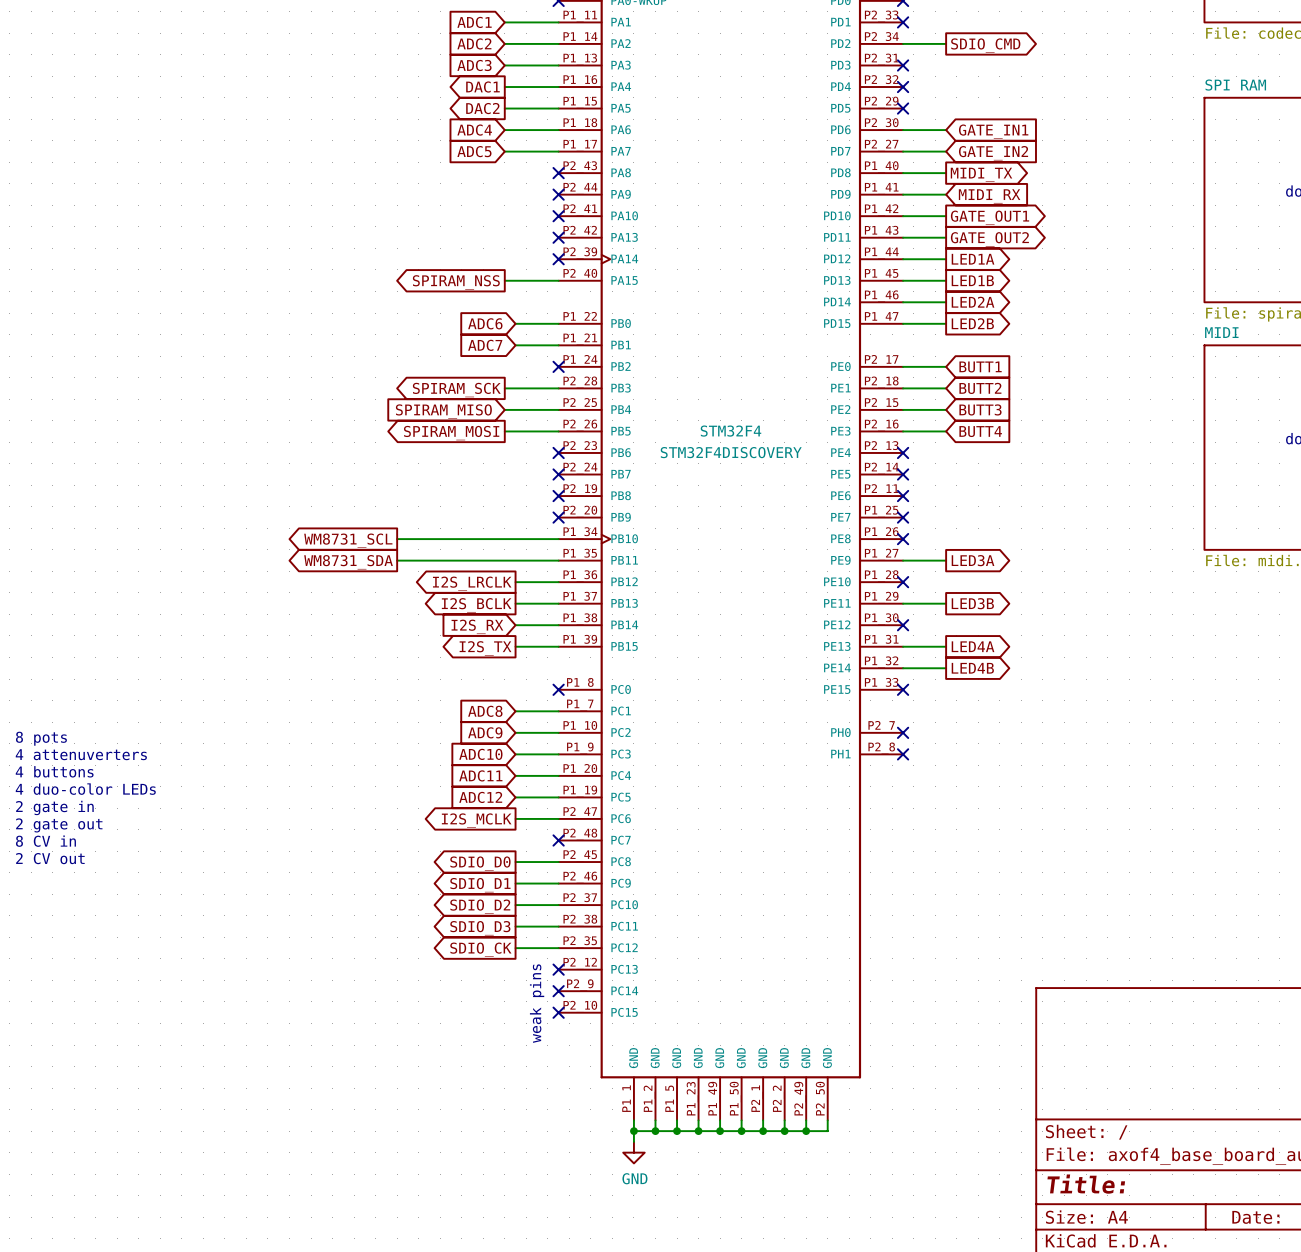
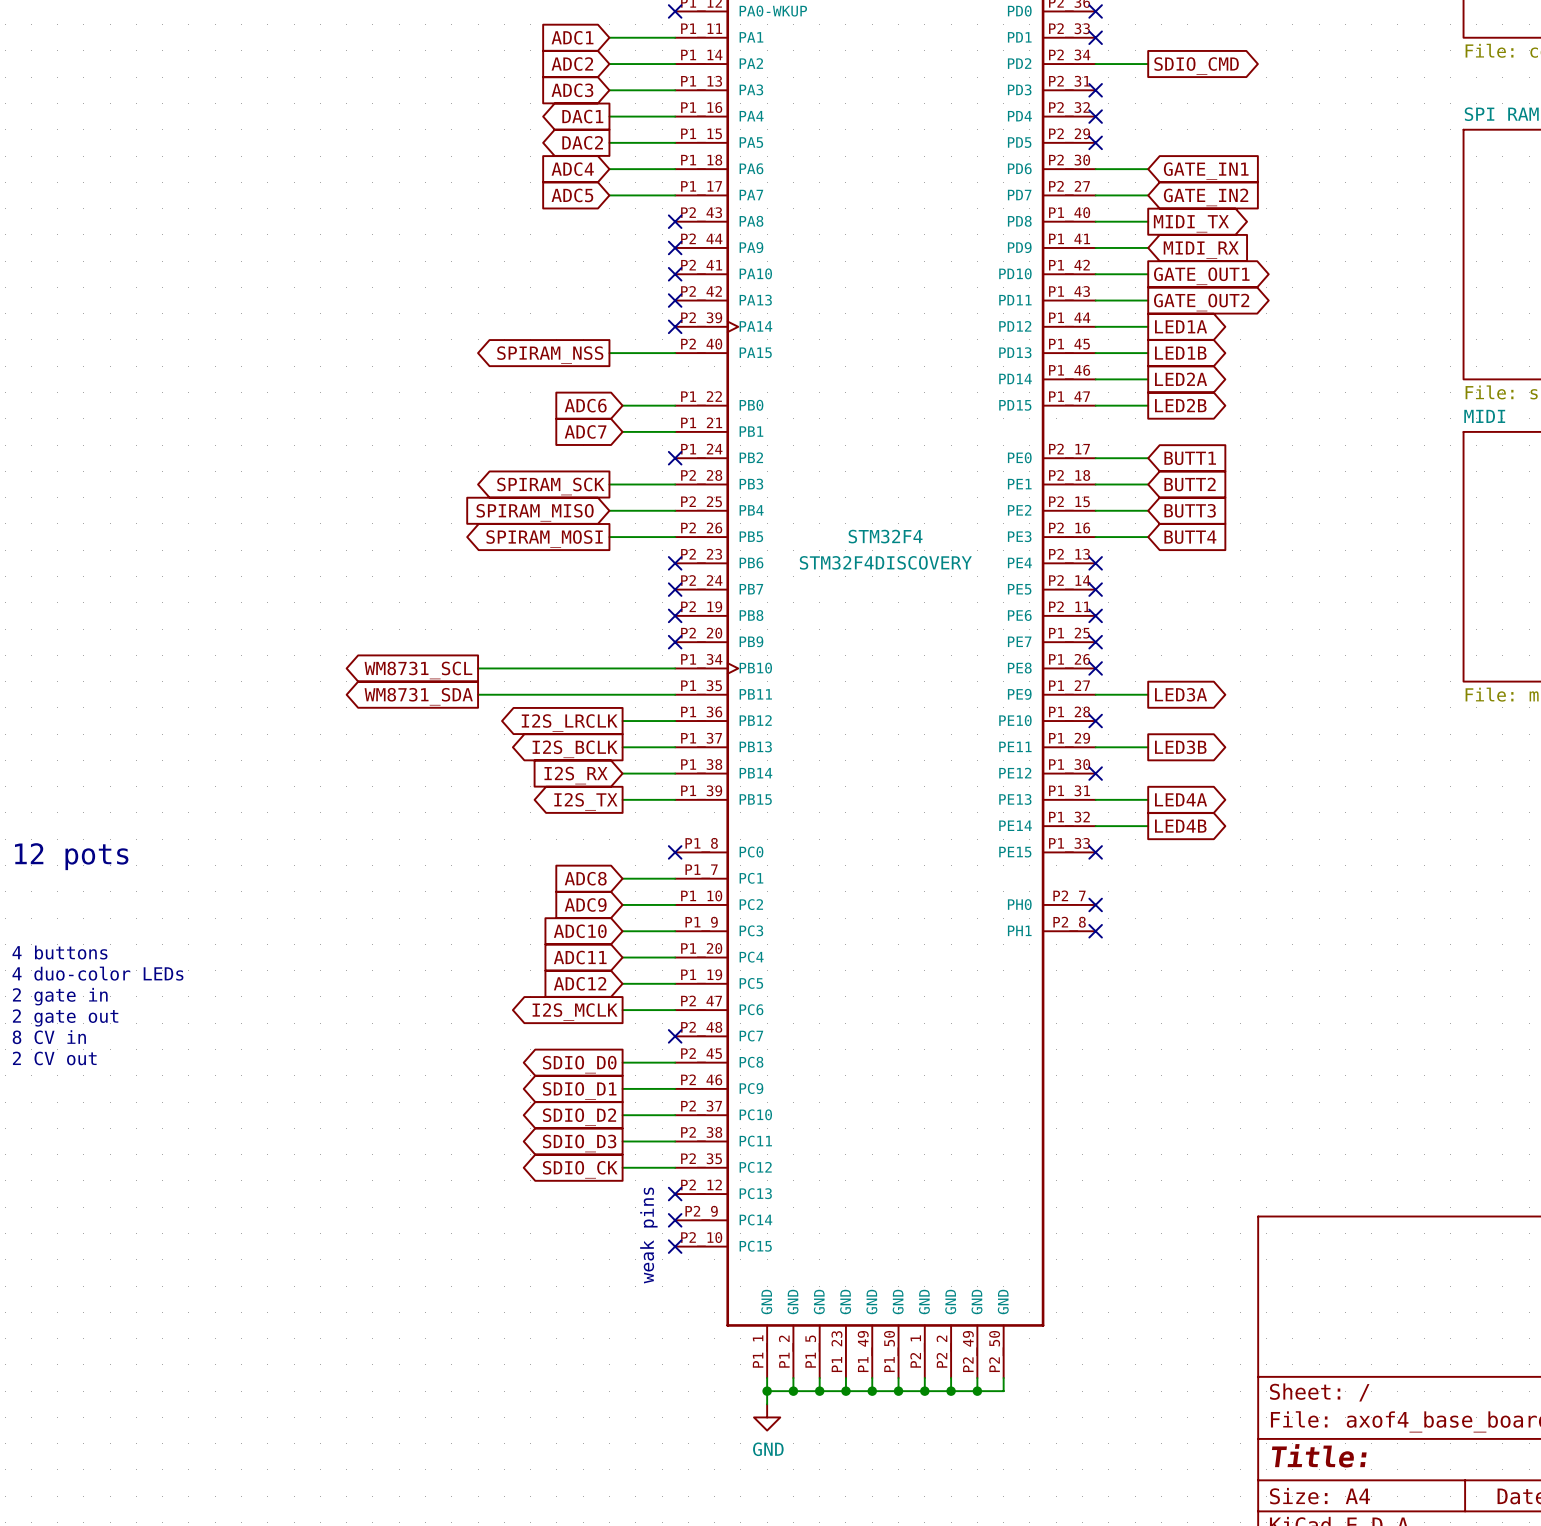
text: none -> 12 pots (71, 856)
text: 8 pots (41, 738) -> none
text: 4 attenuverters (81, 754) -> none

